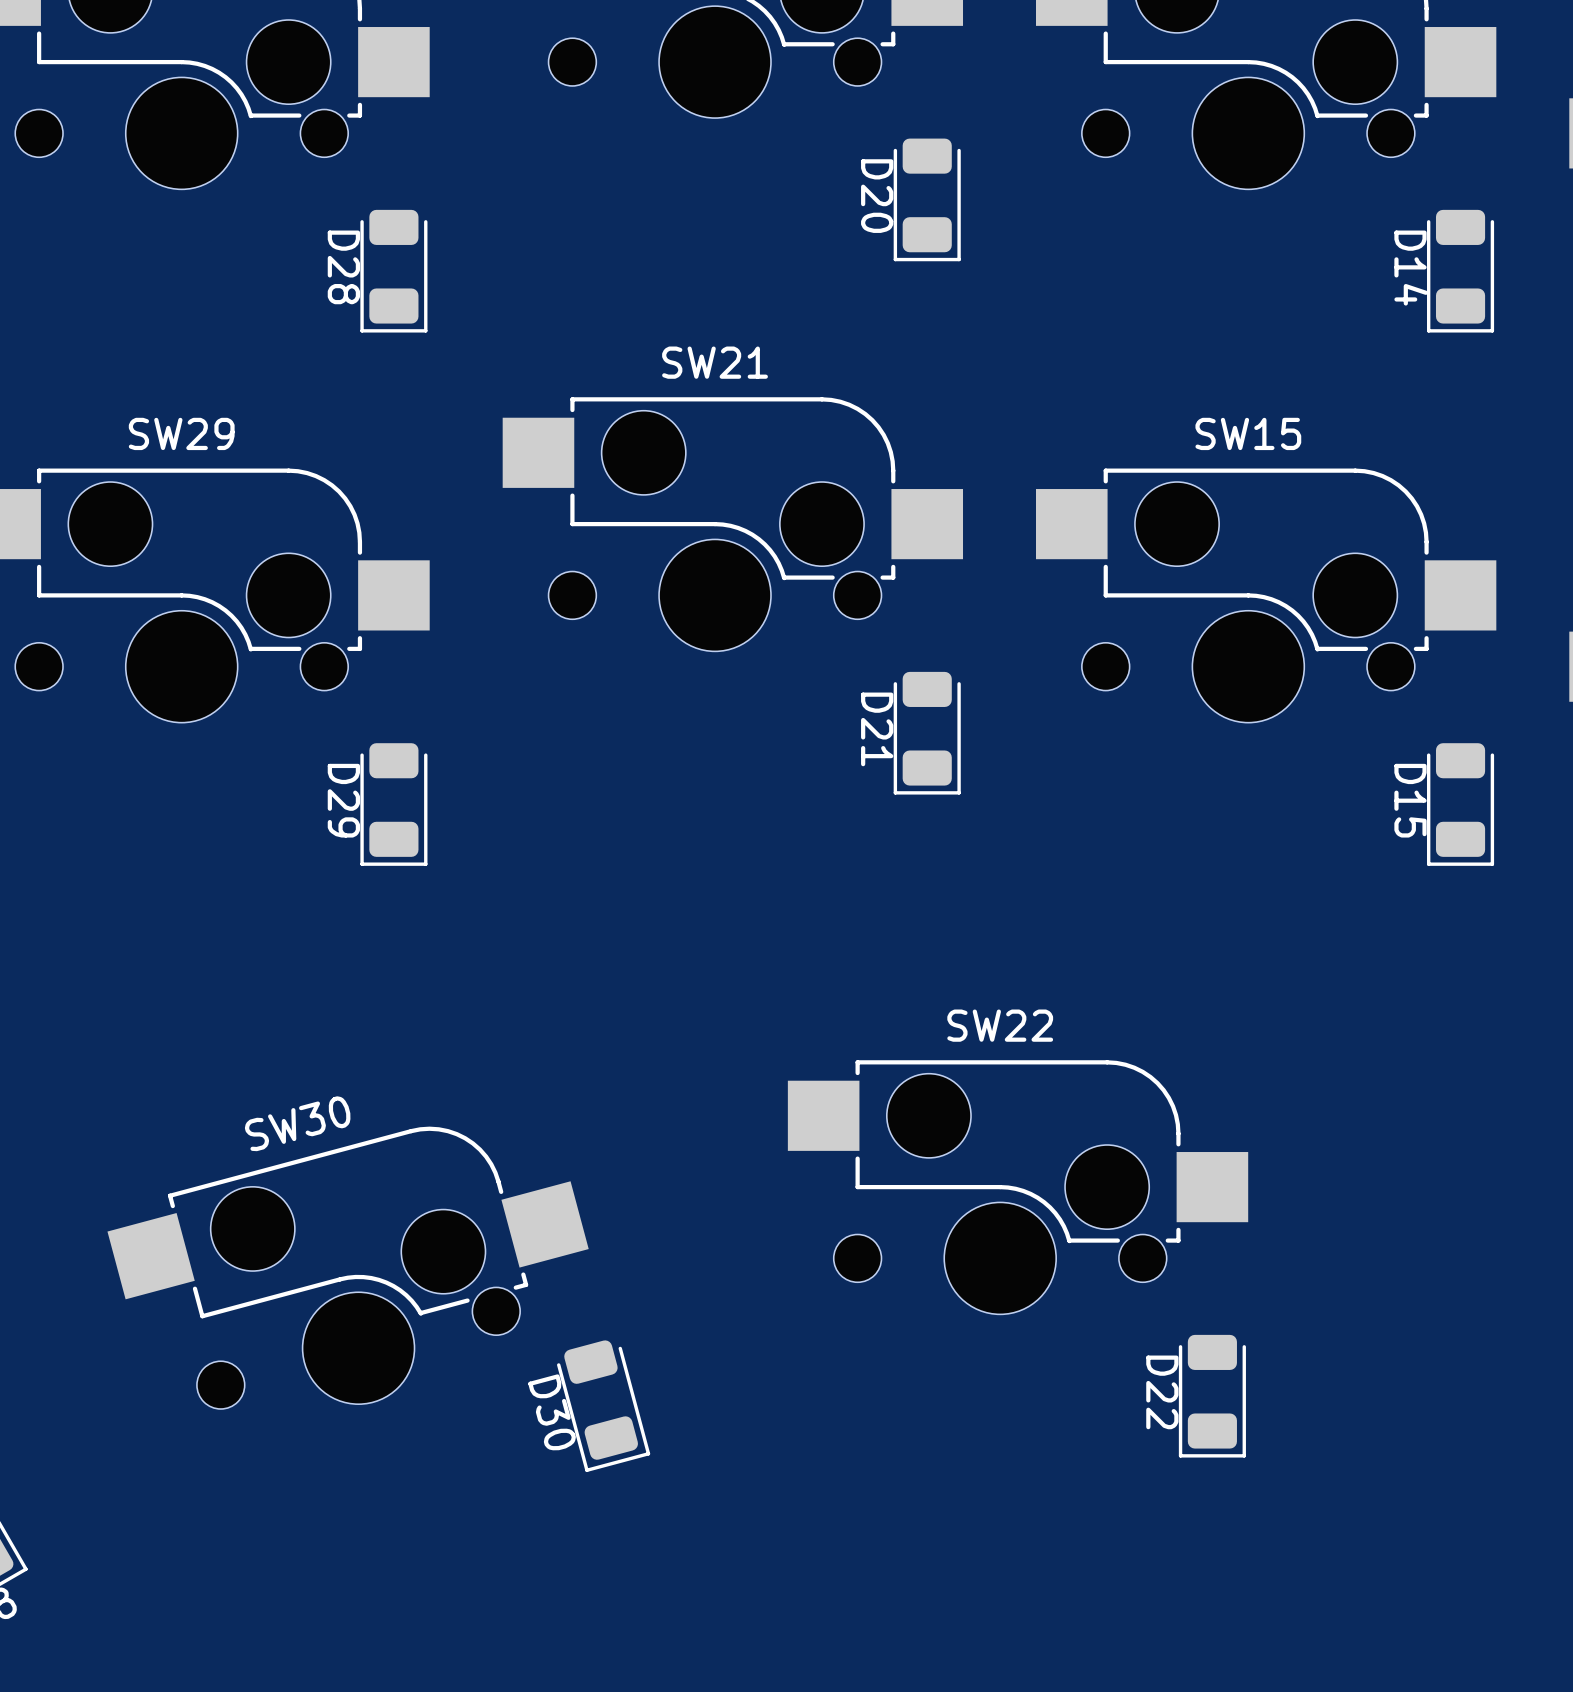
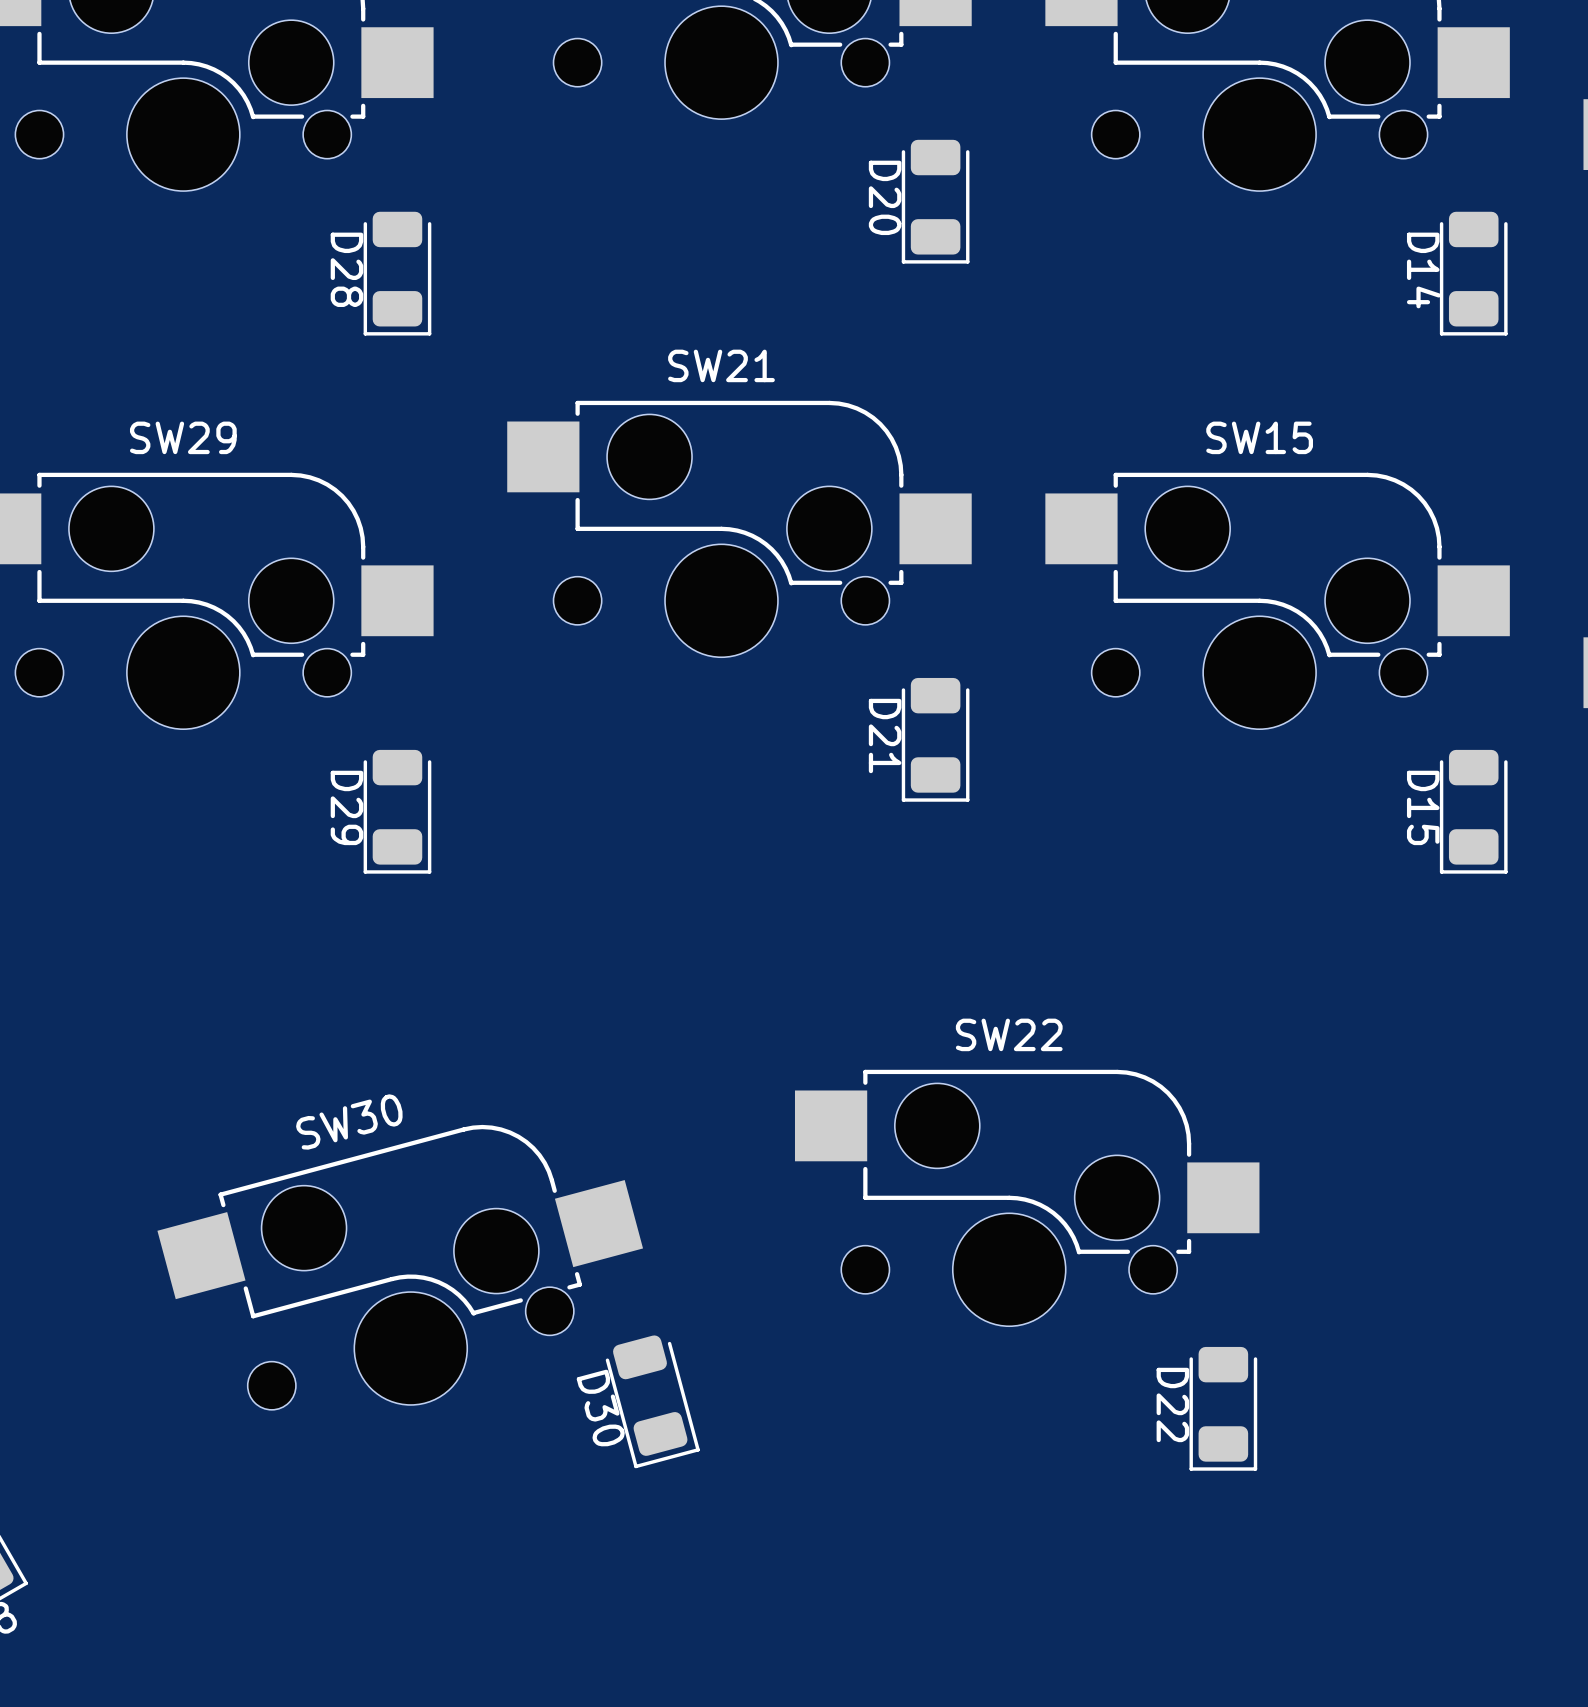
SW30 position: (348, 1267) -> (400, 1267)
D30 position: (603, 1406) -> (652, 1401)

